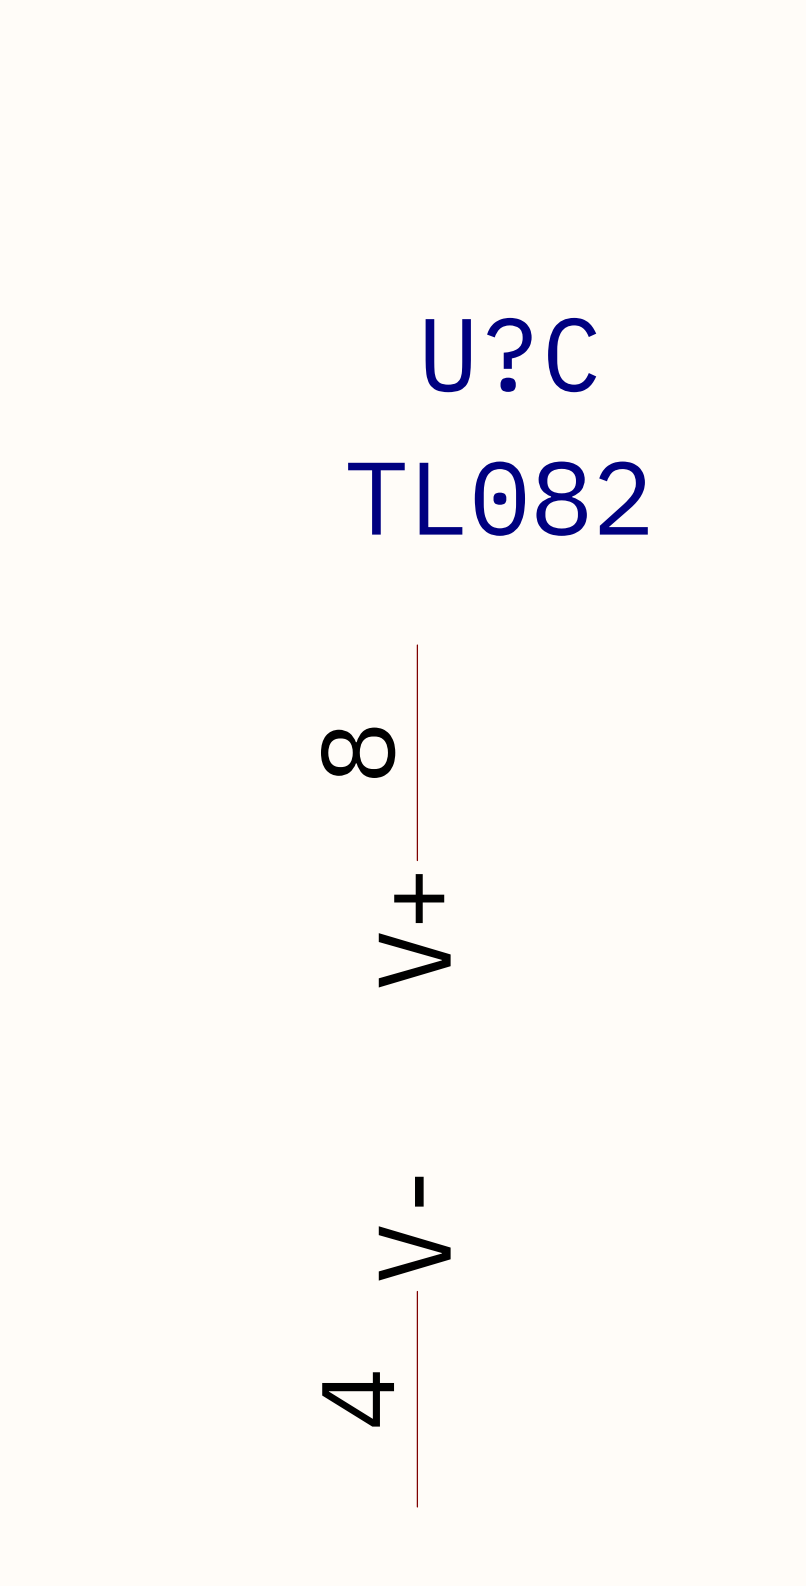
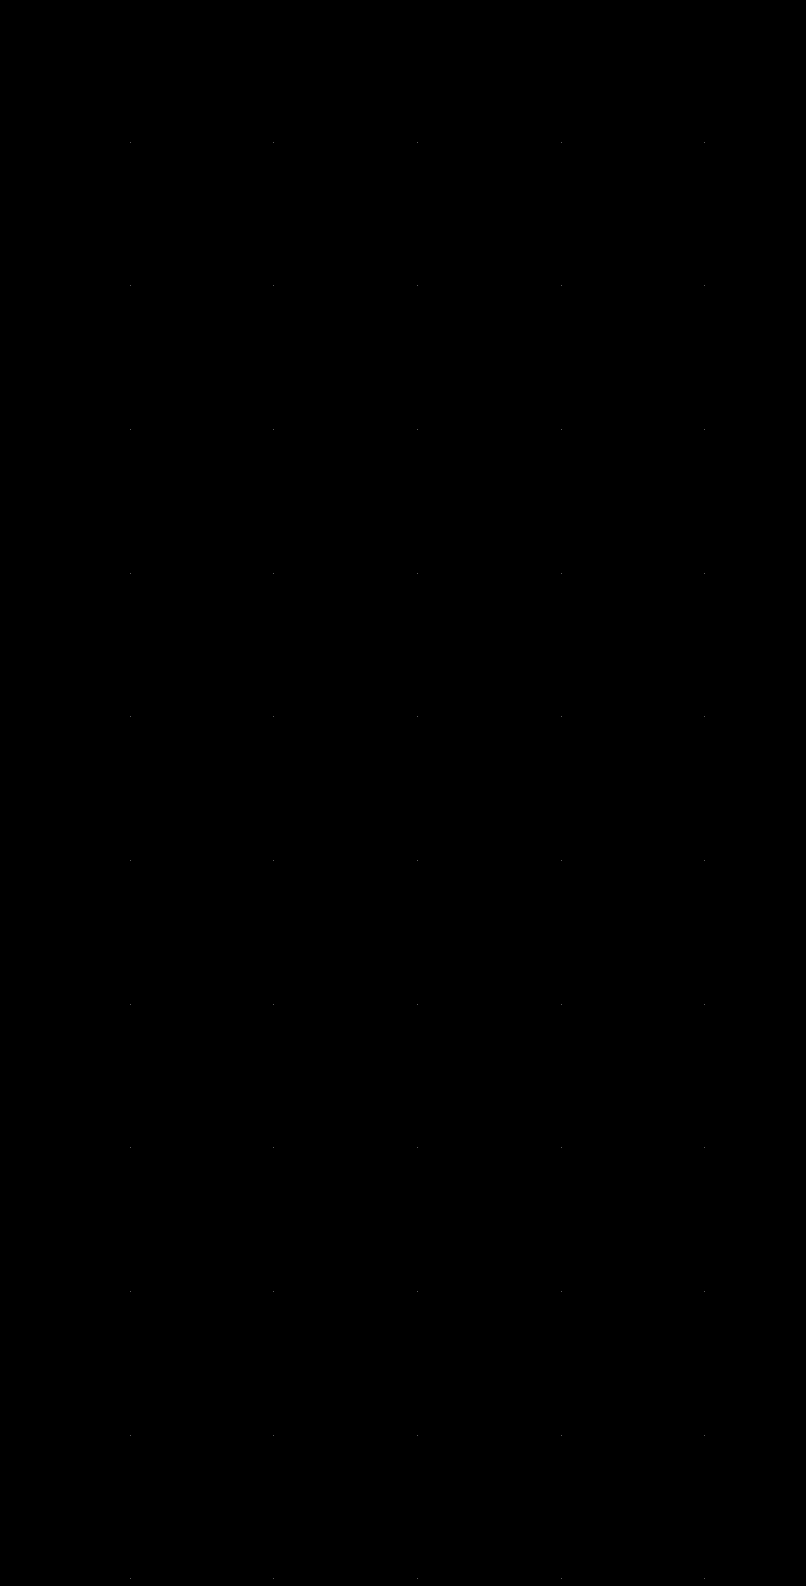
U?C: TL082 (417, 1076) -> none

